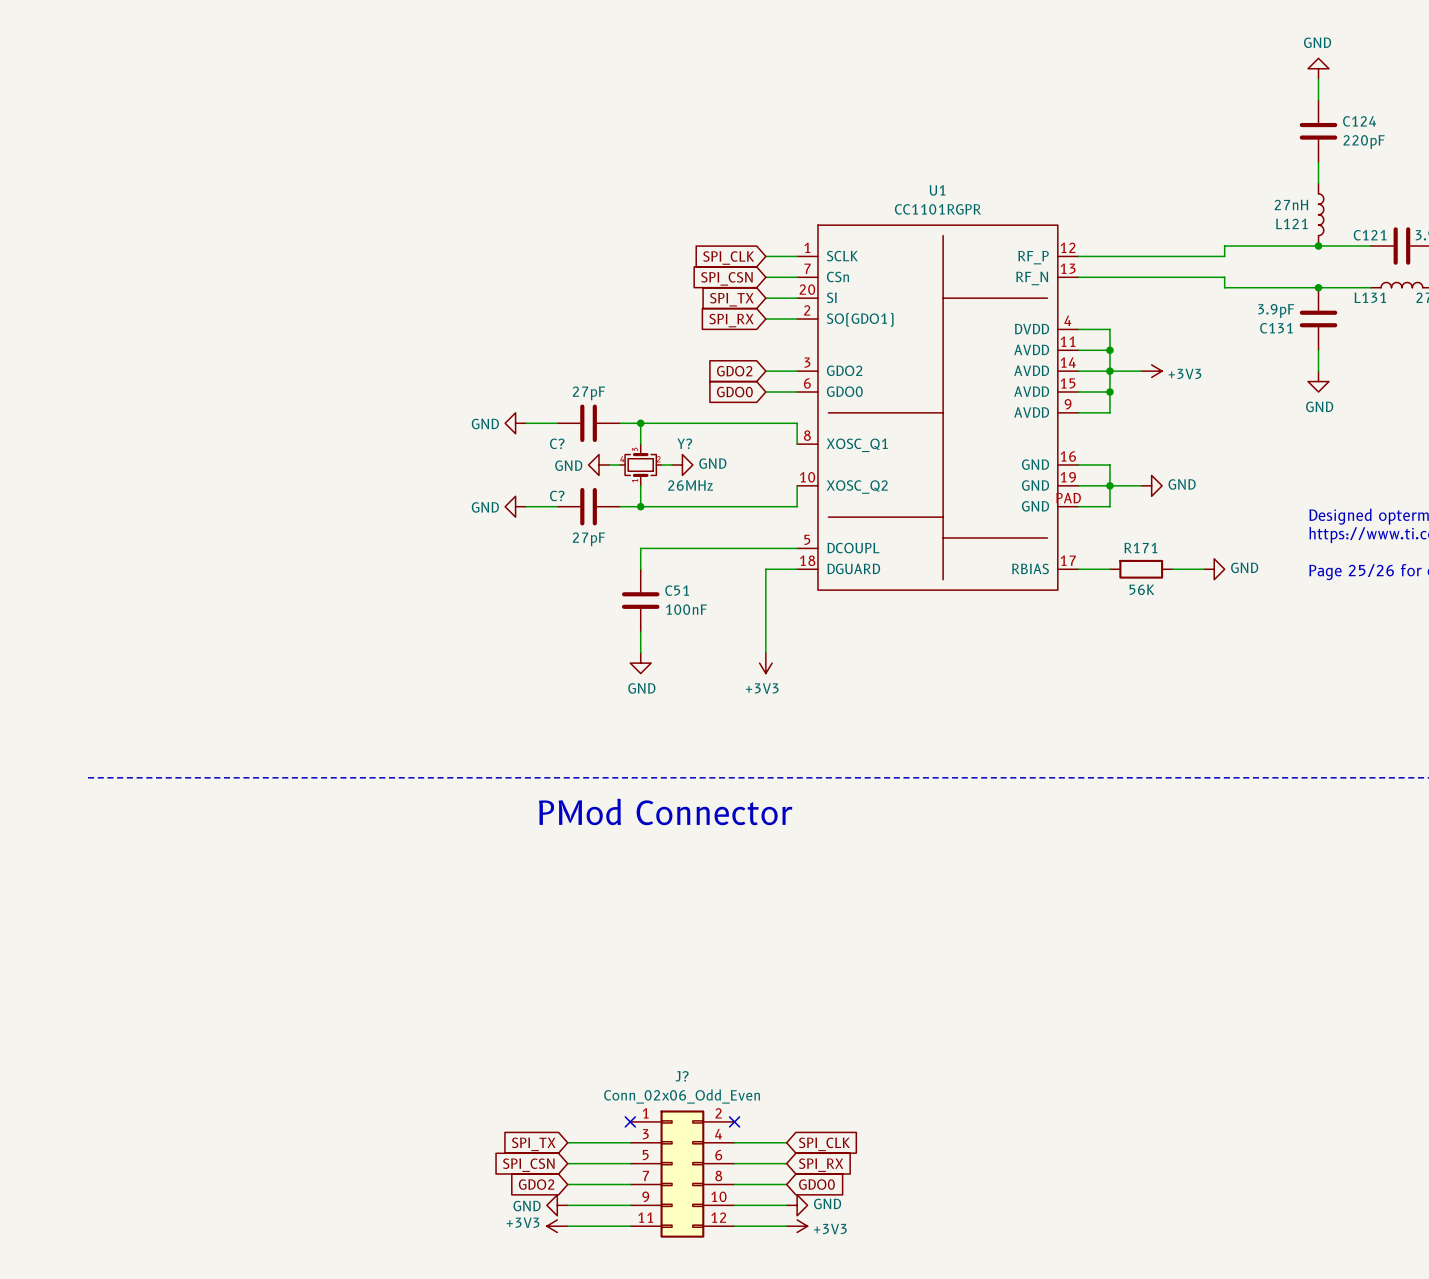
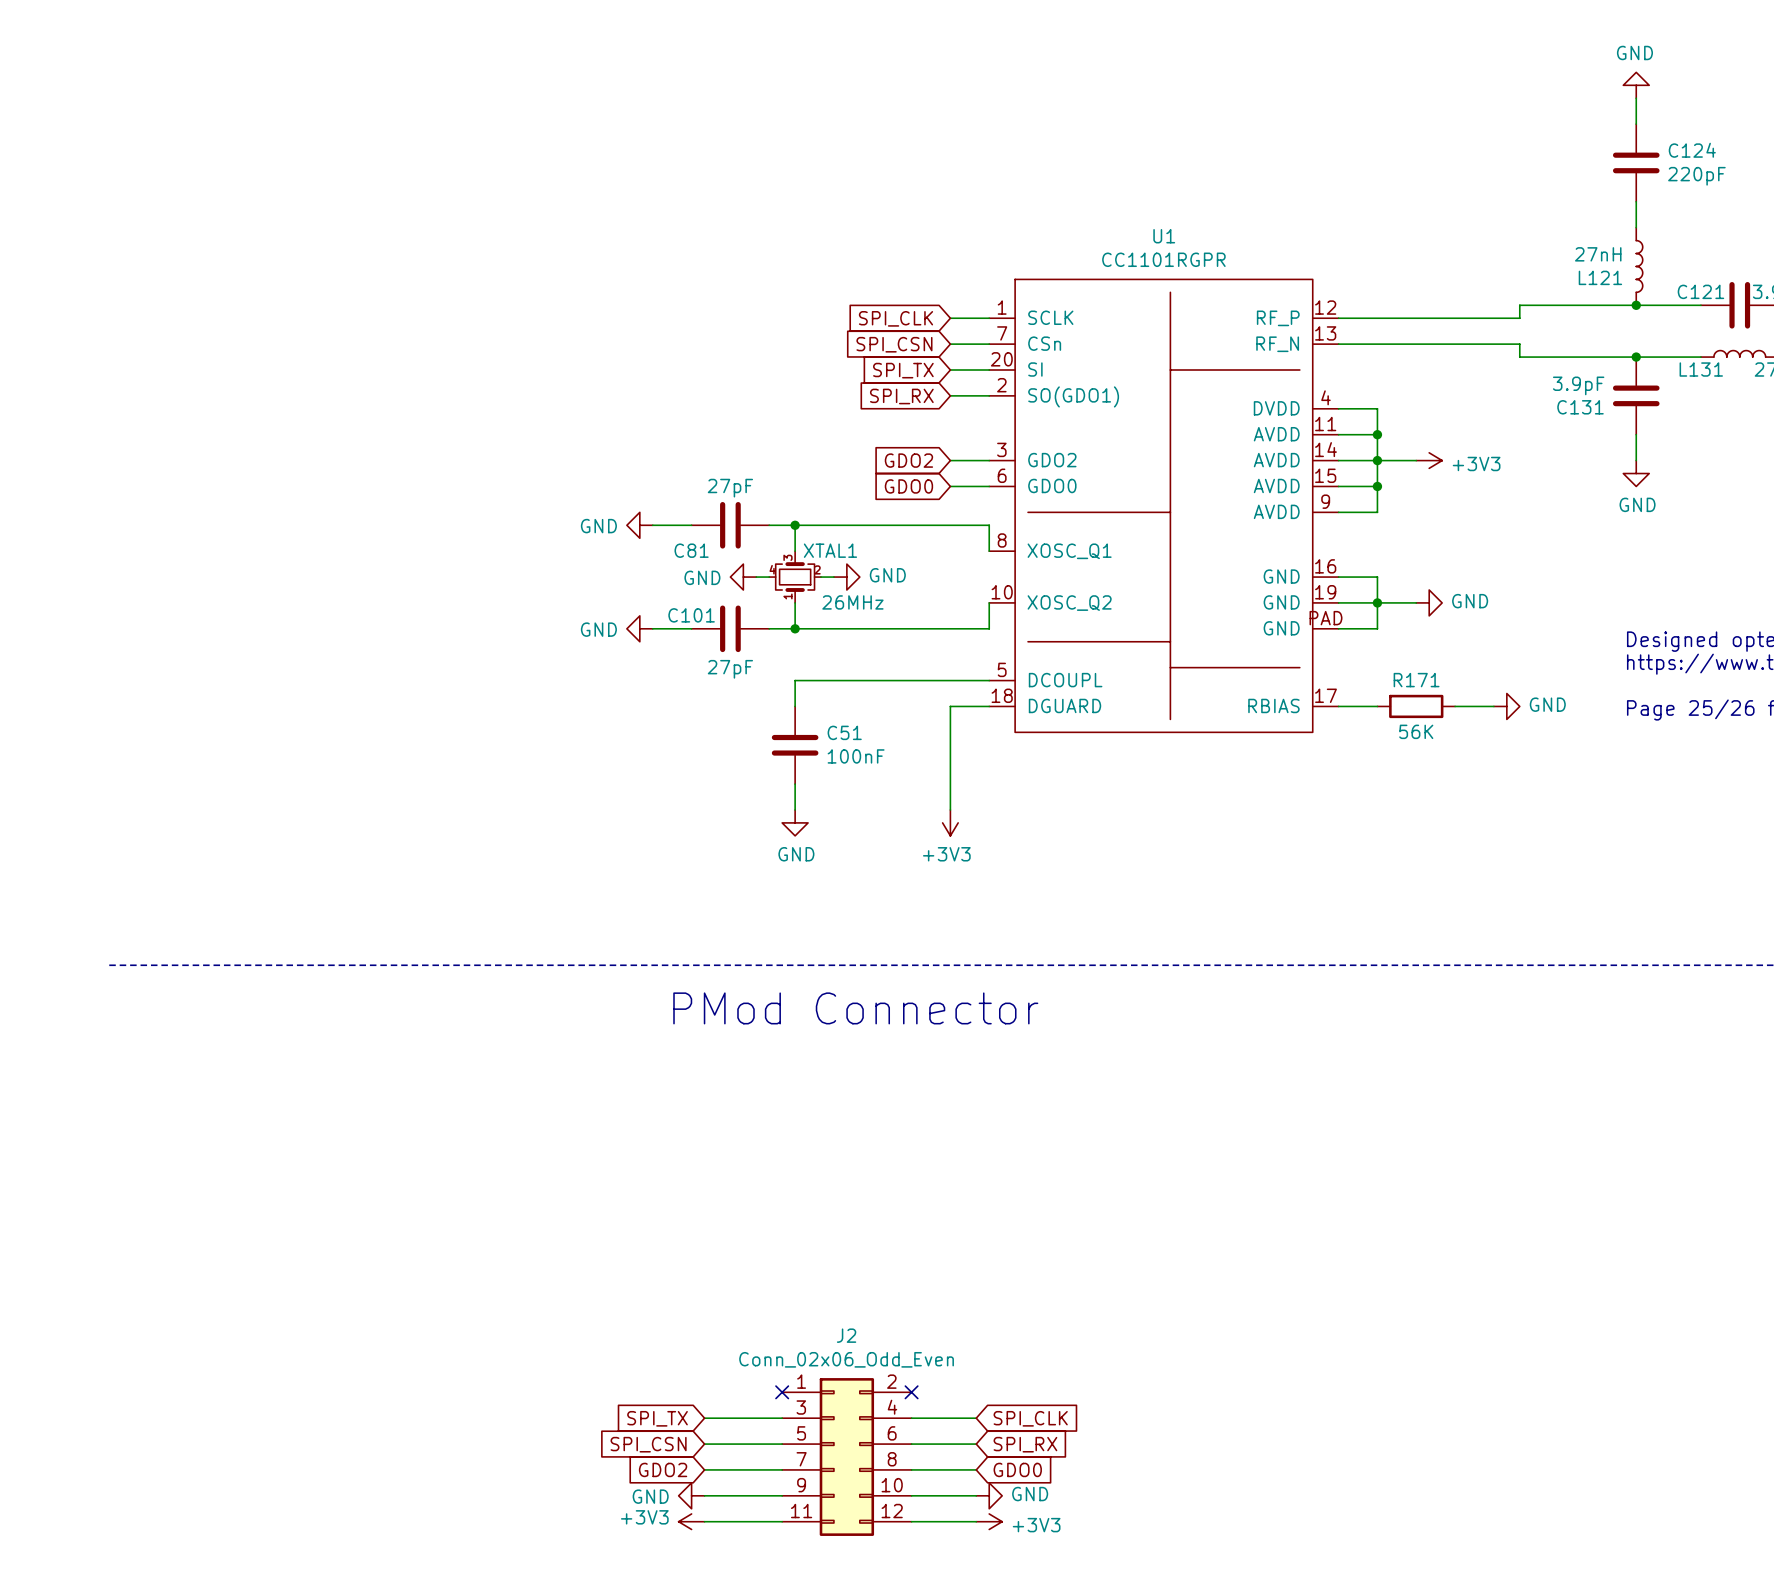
C? name: C? (557, 443) -> C81 (691, 550)
Y? name: Y? (684, 443) -> XTAL1 (830, 550)
C? name: C? (557, 495) -> C101 (691, 615)
J? name: J? (682, 1076) -> J2 (846, 1335)

